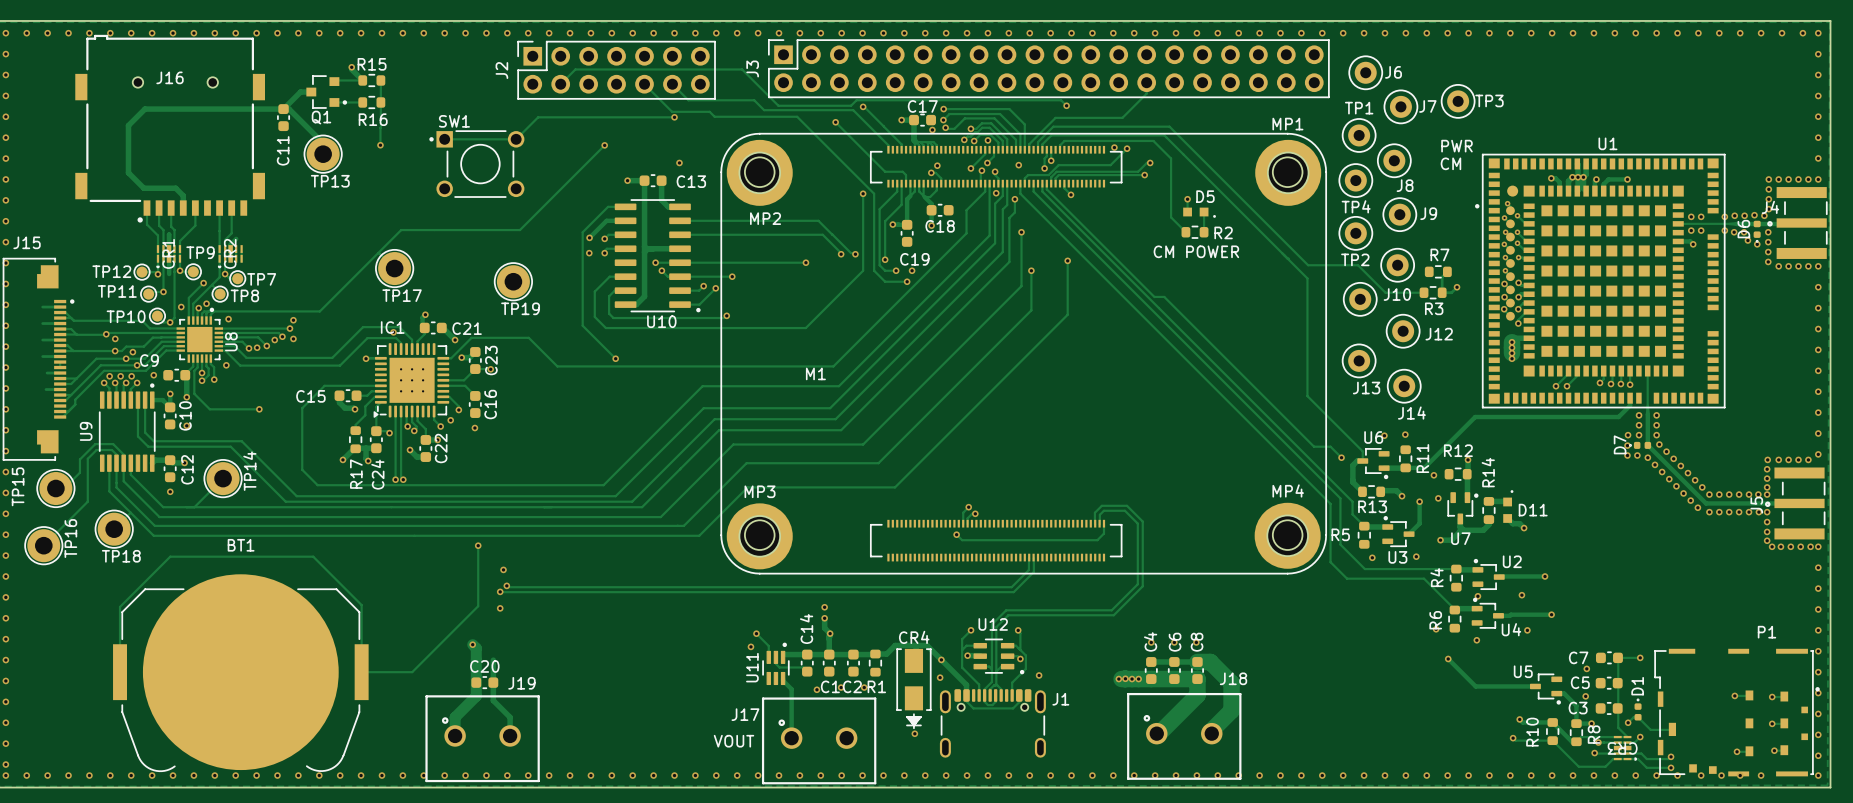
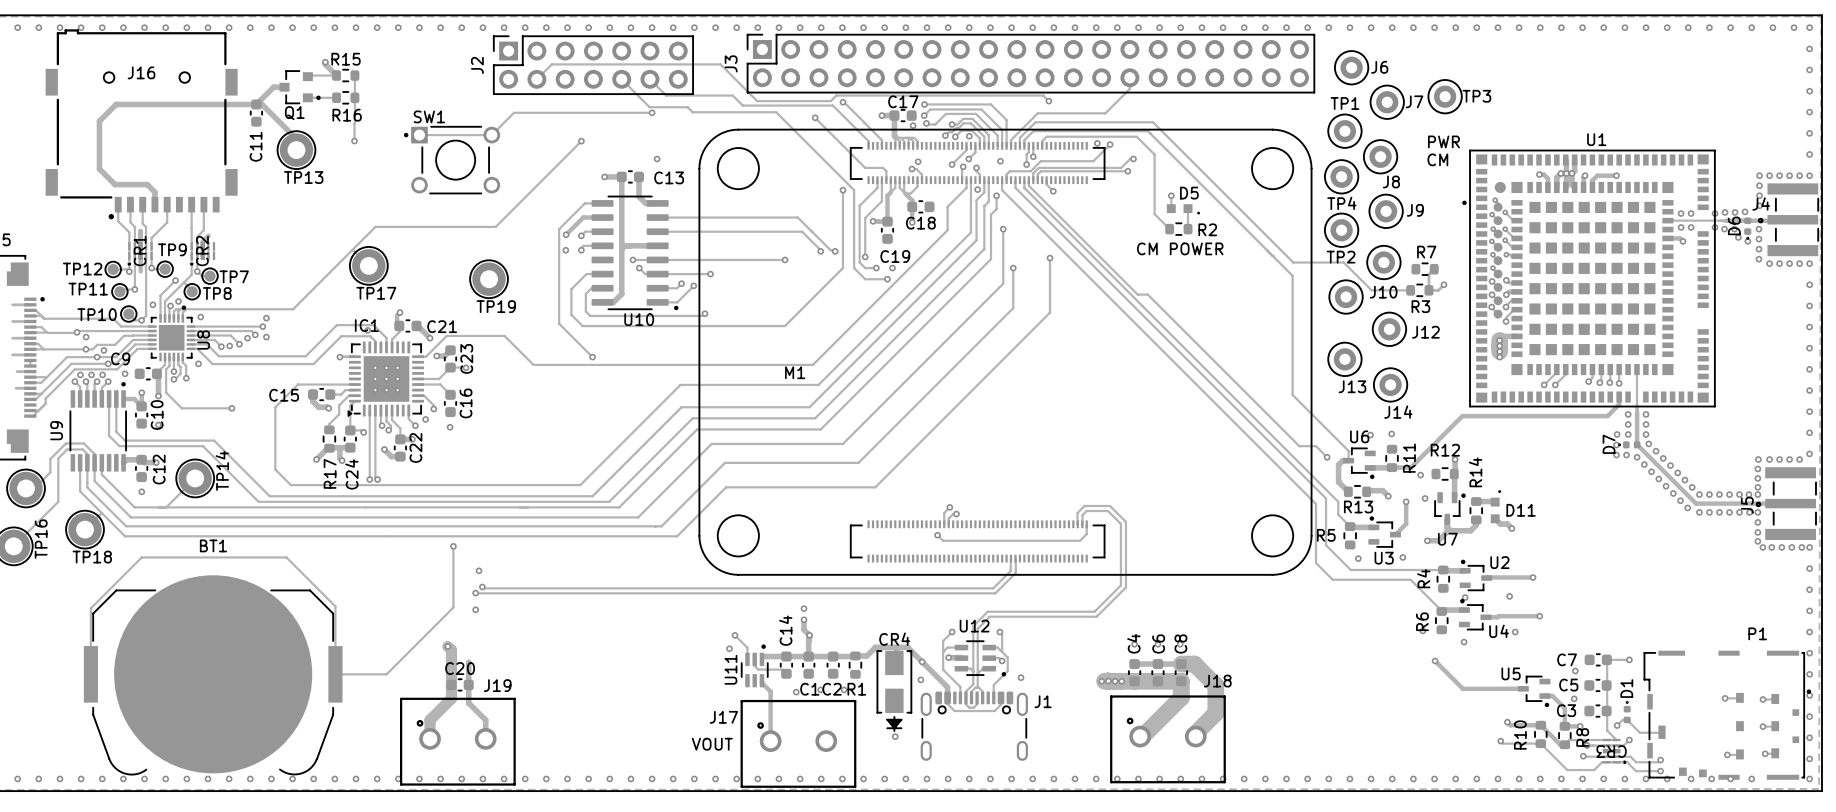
M1 footprint: [720, 133, 1327, 575] -> [698, 128, 1313, 576]
MP2: (759, 172) -> none
MP1: (1288, 172) -> none
via: (1764, 215) -> none
MP4: (1287, 535) -> none
MP3: (759, 536) -> none

